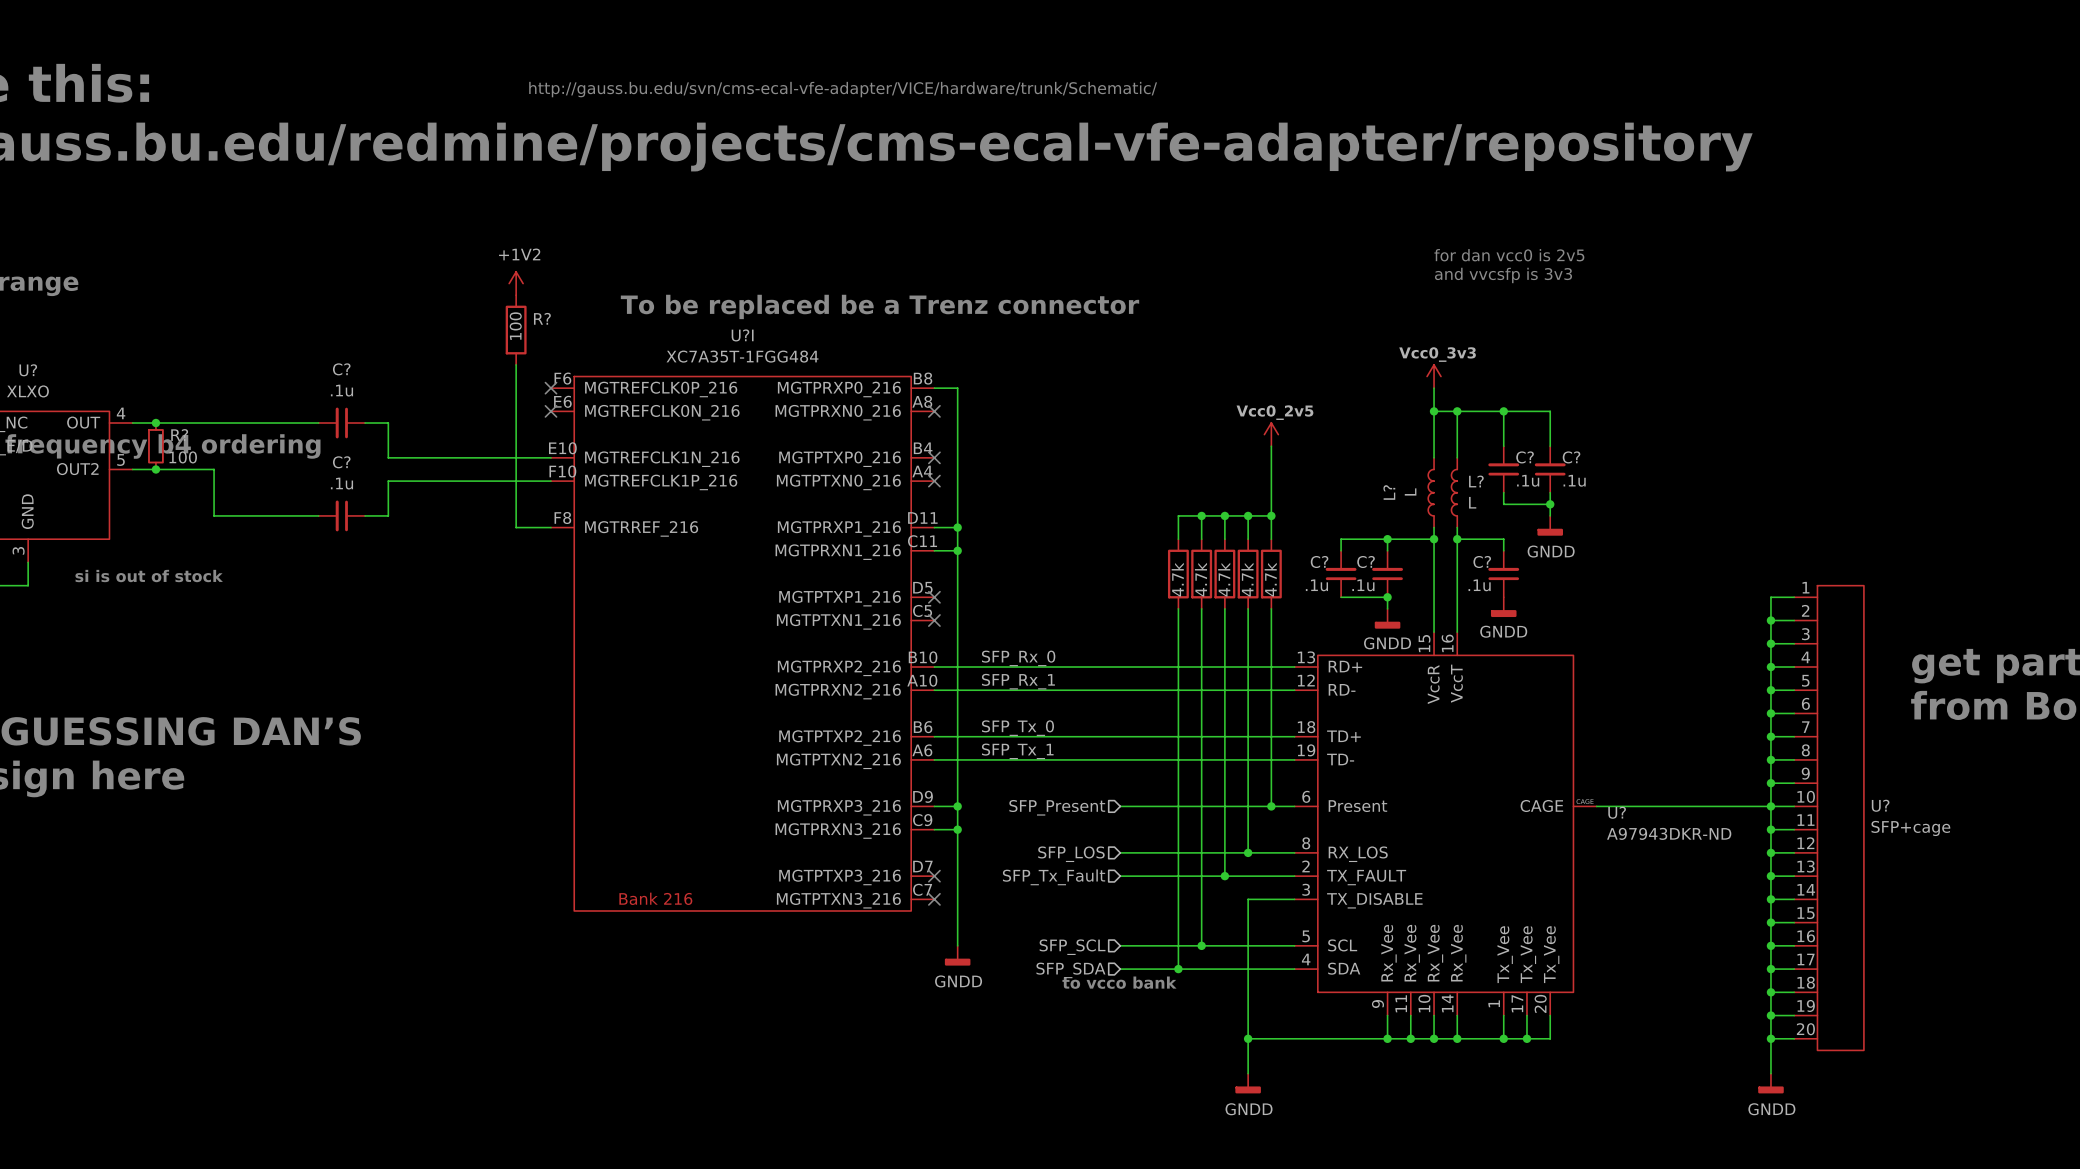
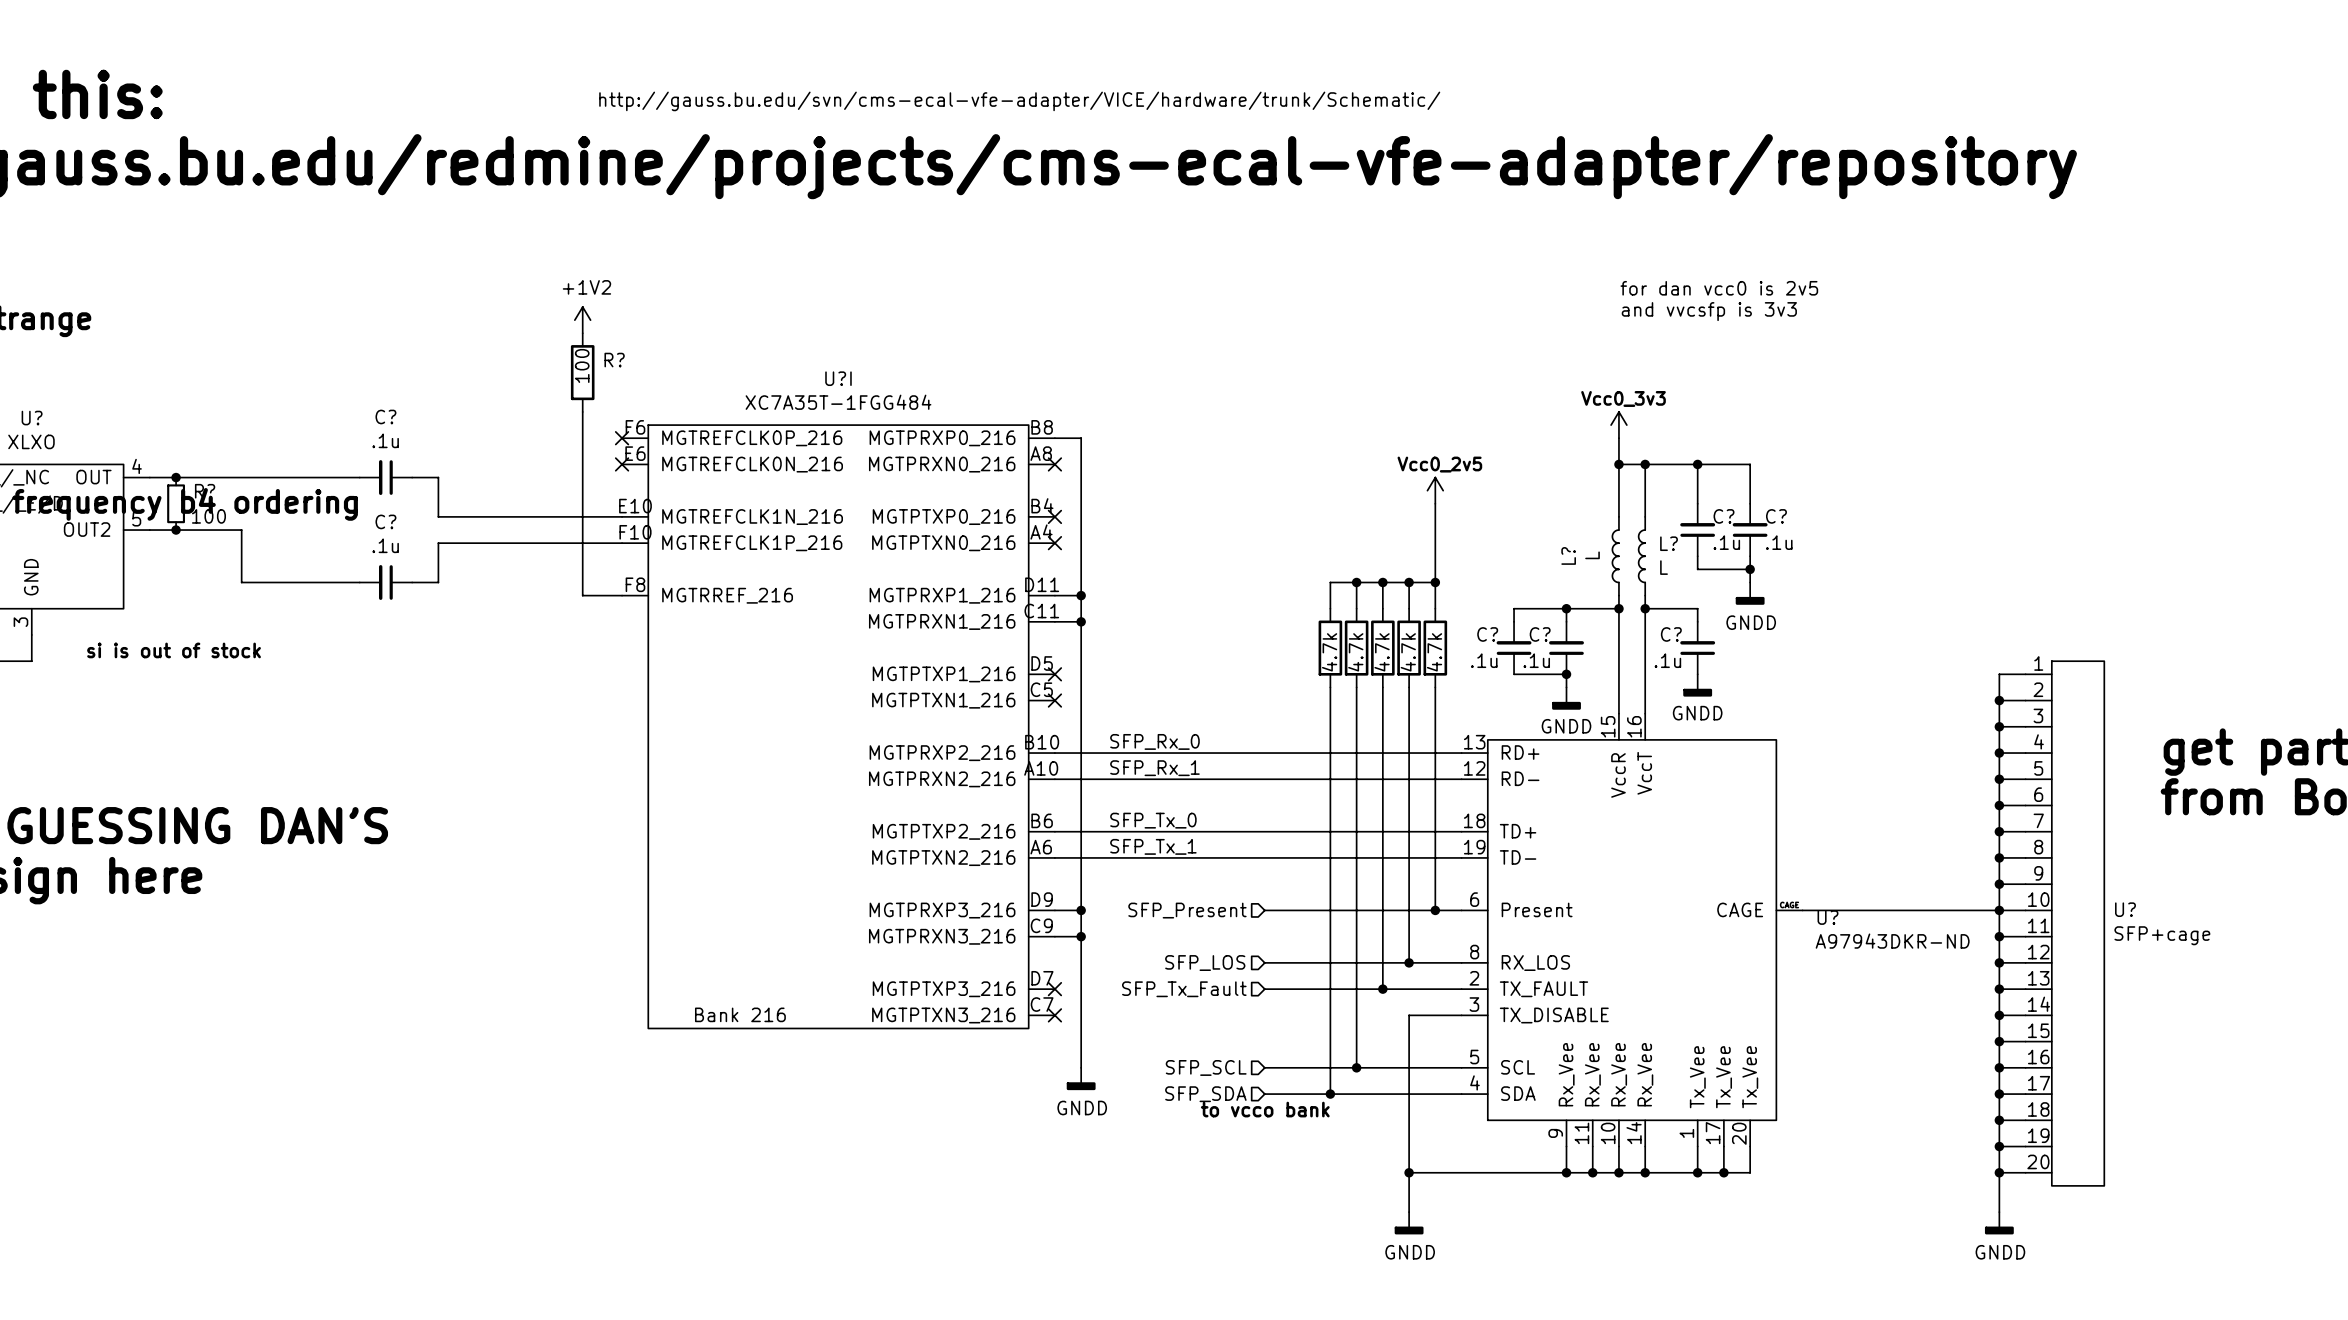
text: To be replaced be a Trenz connector (880, 306) -> none

